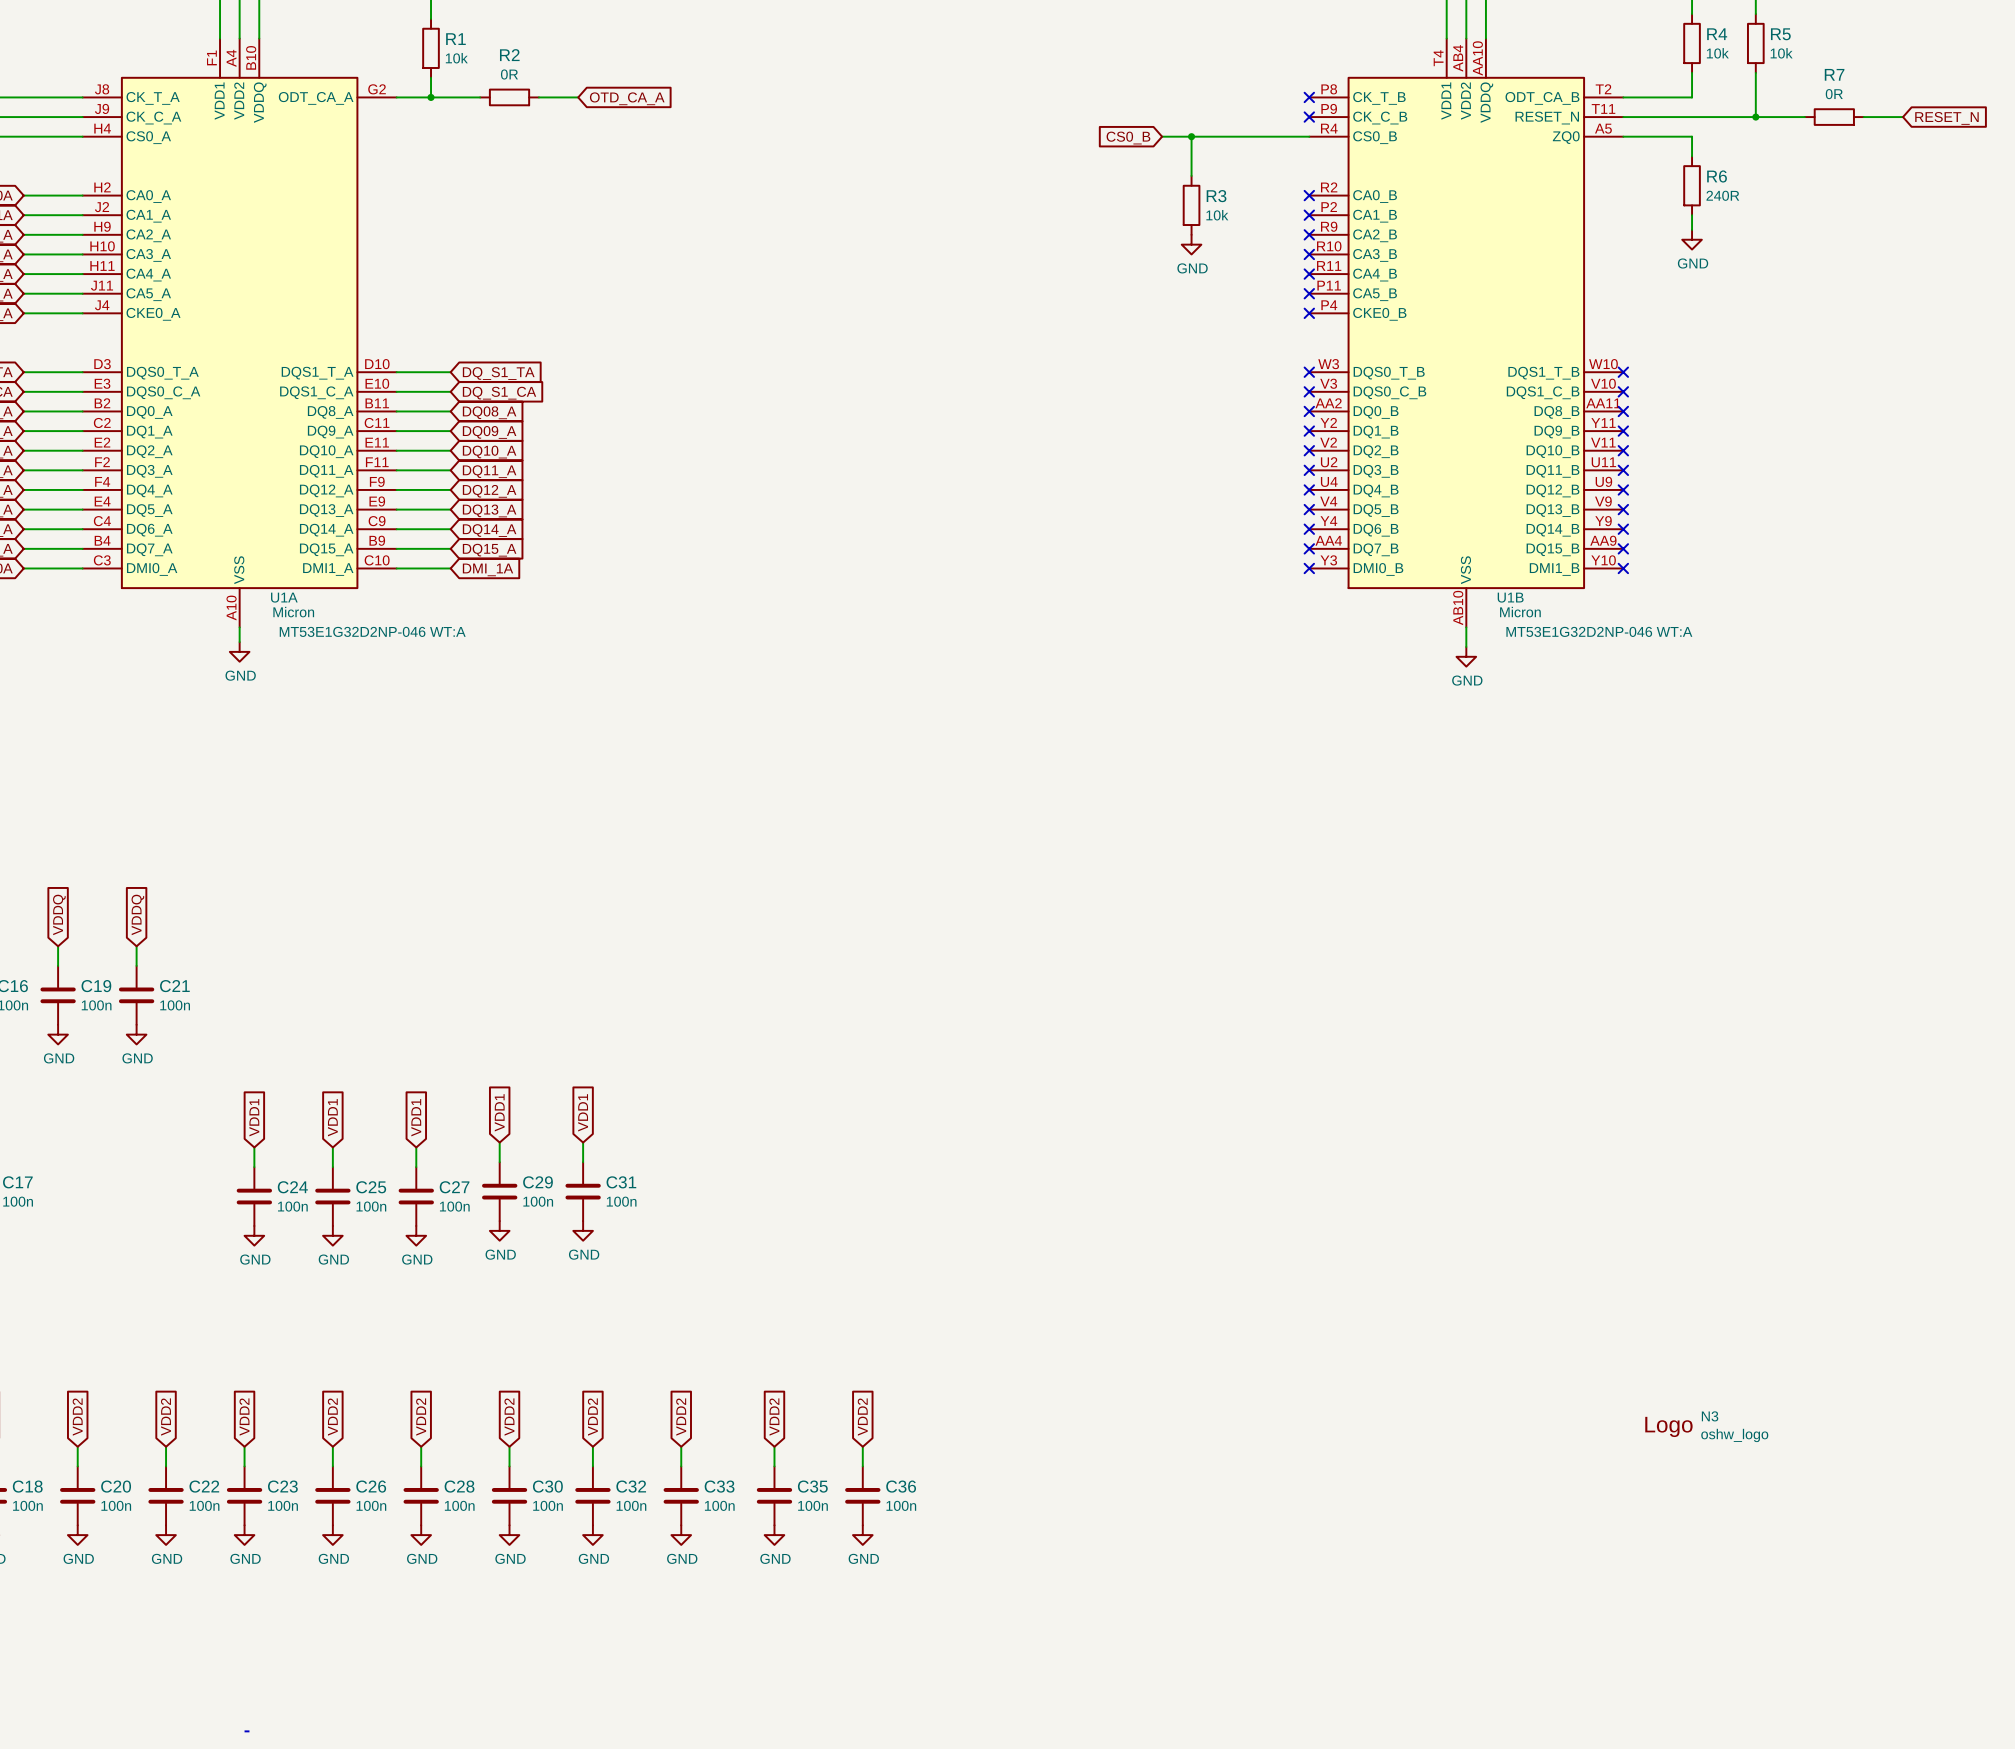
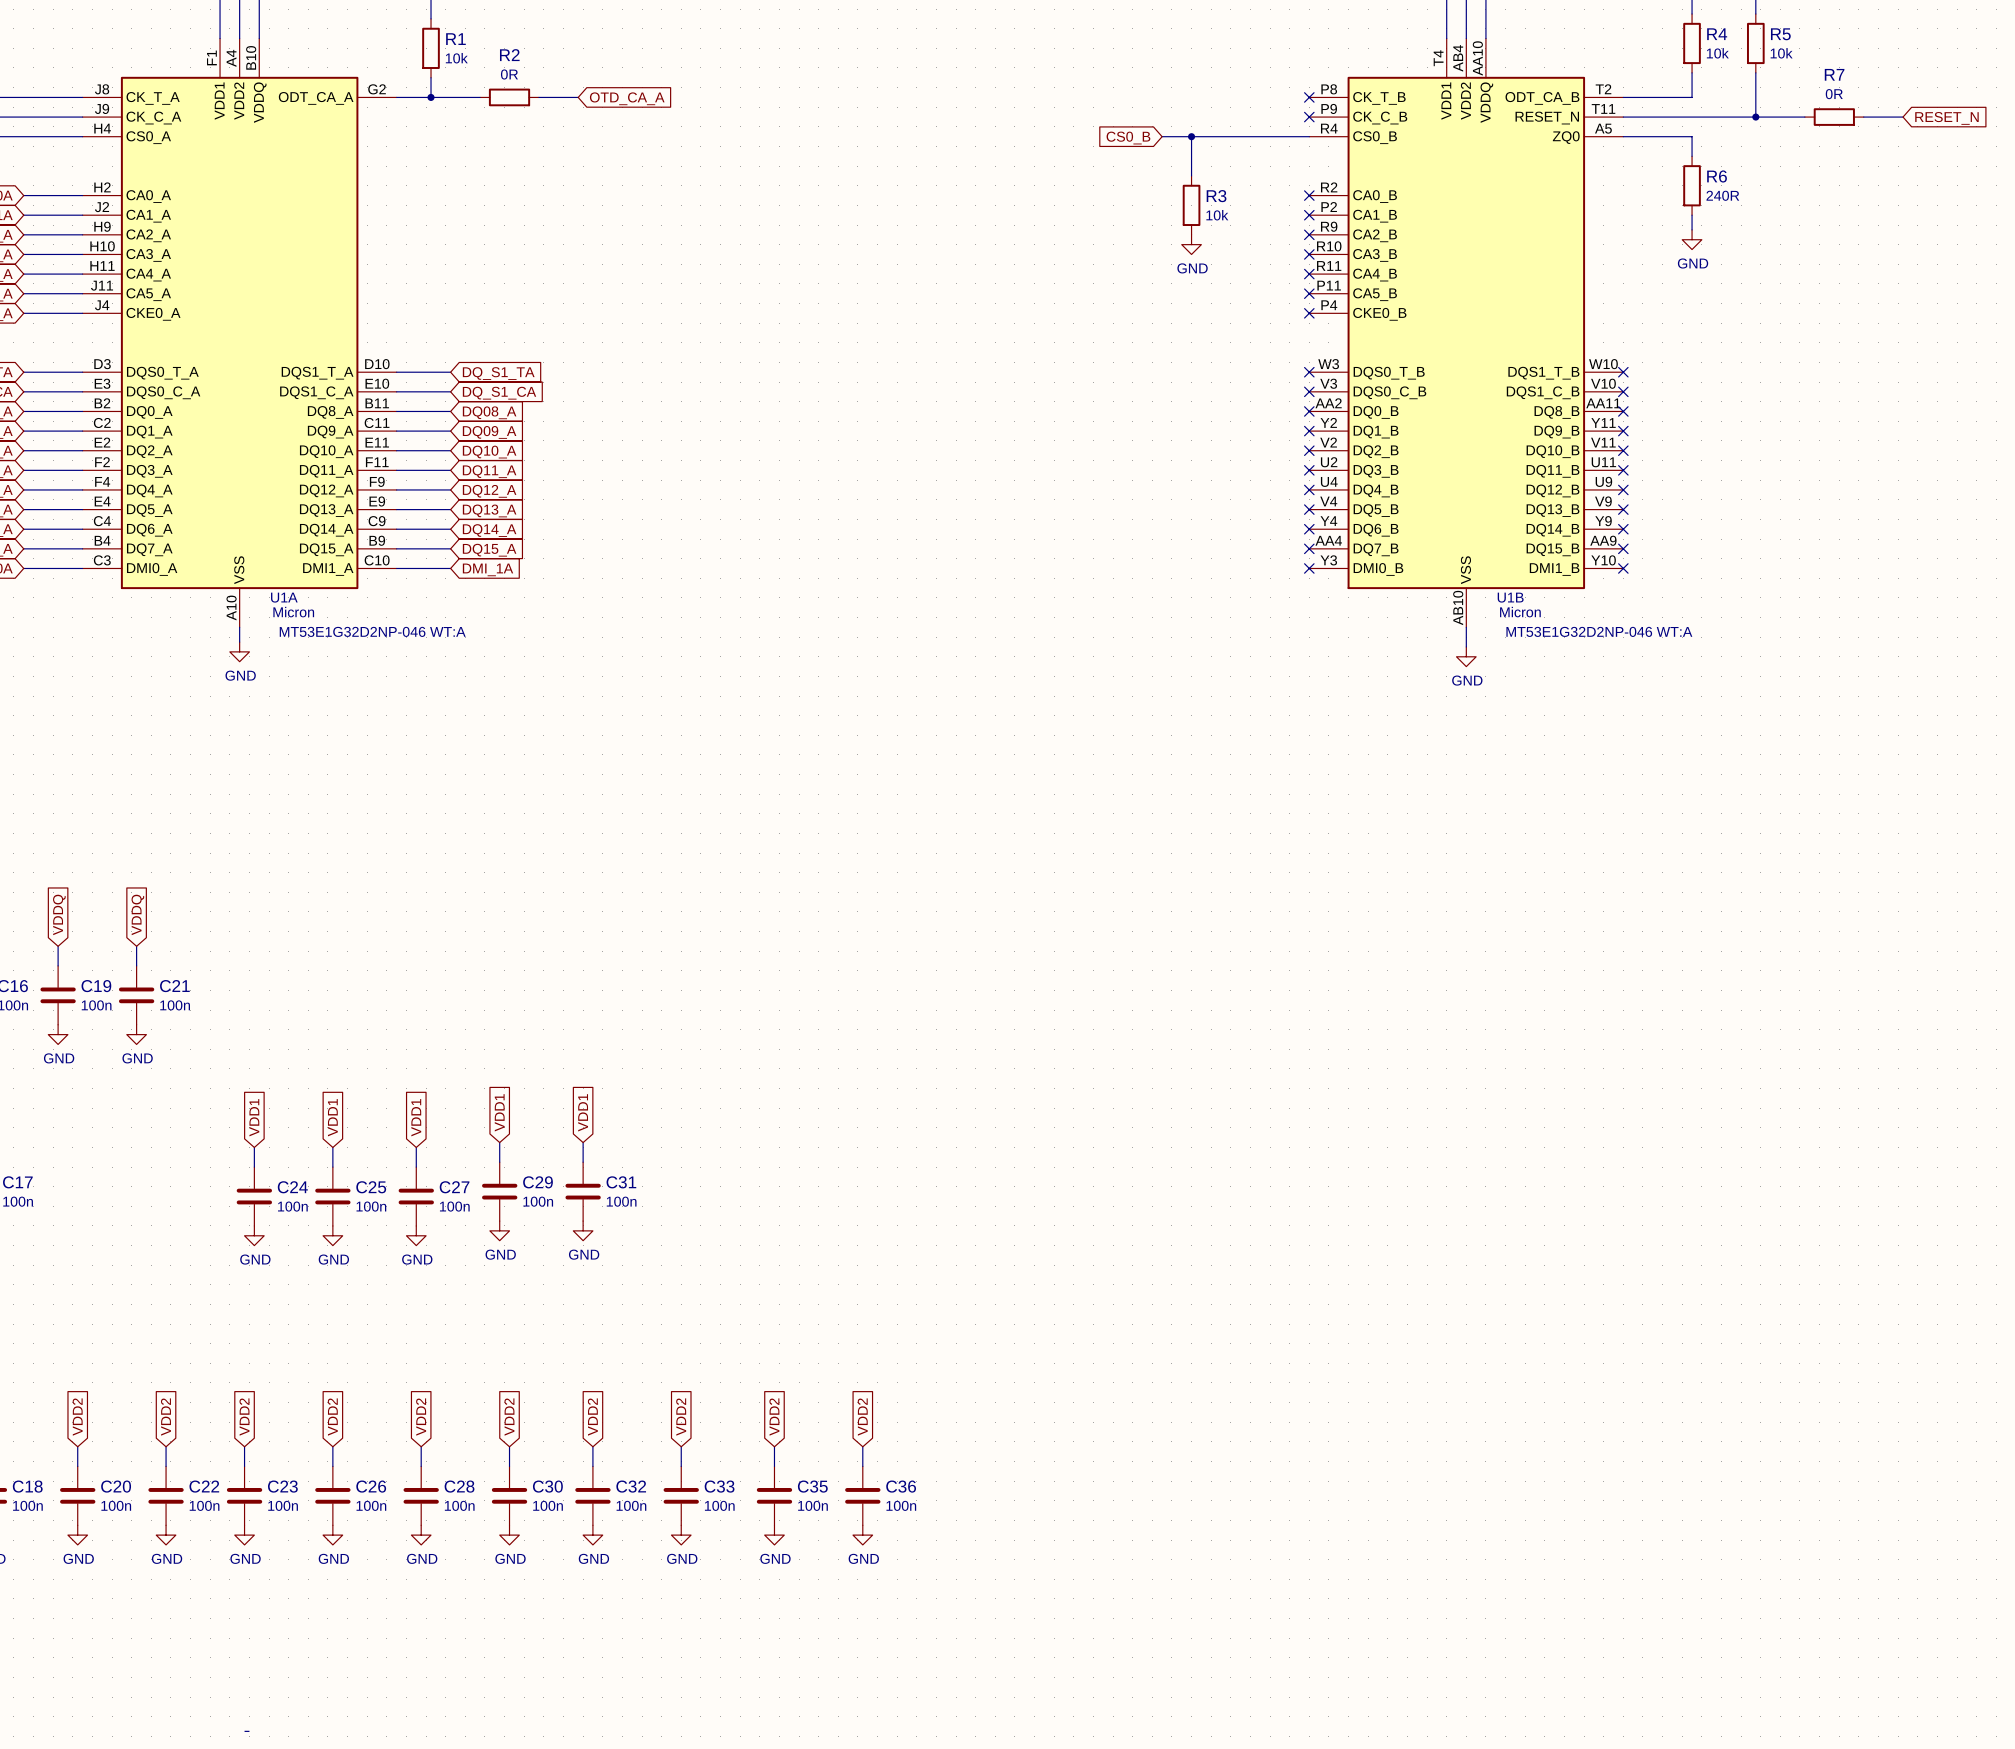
N3: oshw_logo (1706, 1426) -> none

